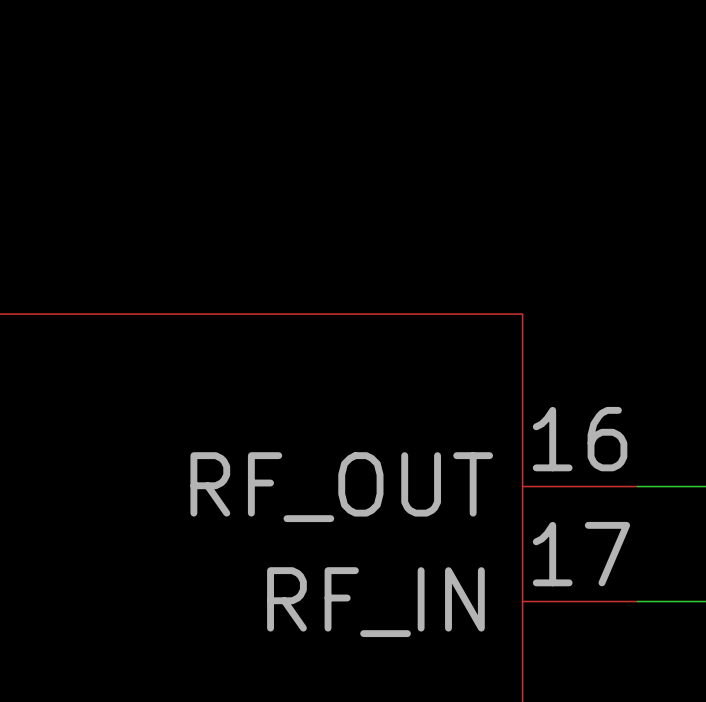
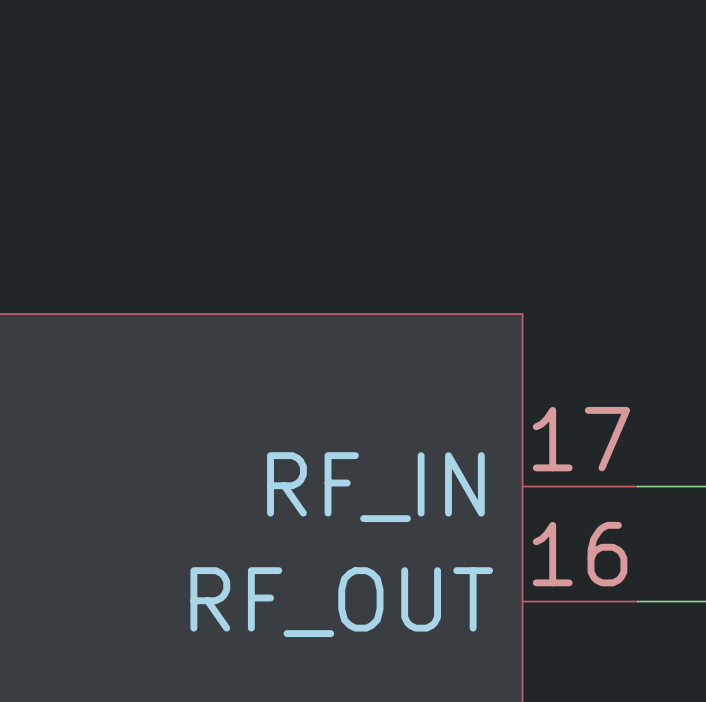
part pin number: 16 (580, 439) -> 17 (581, 439)
part pin name: RF_OUT (341, 487) -> RF_IN (375, 487)
part pin number: 17 (581, 554) -> 16 (580, 554)
part pin name: RF_IN (375, 602) -> RF_OUT (341, 602)

